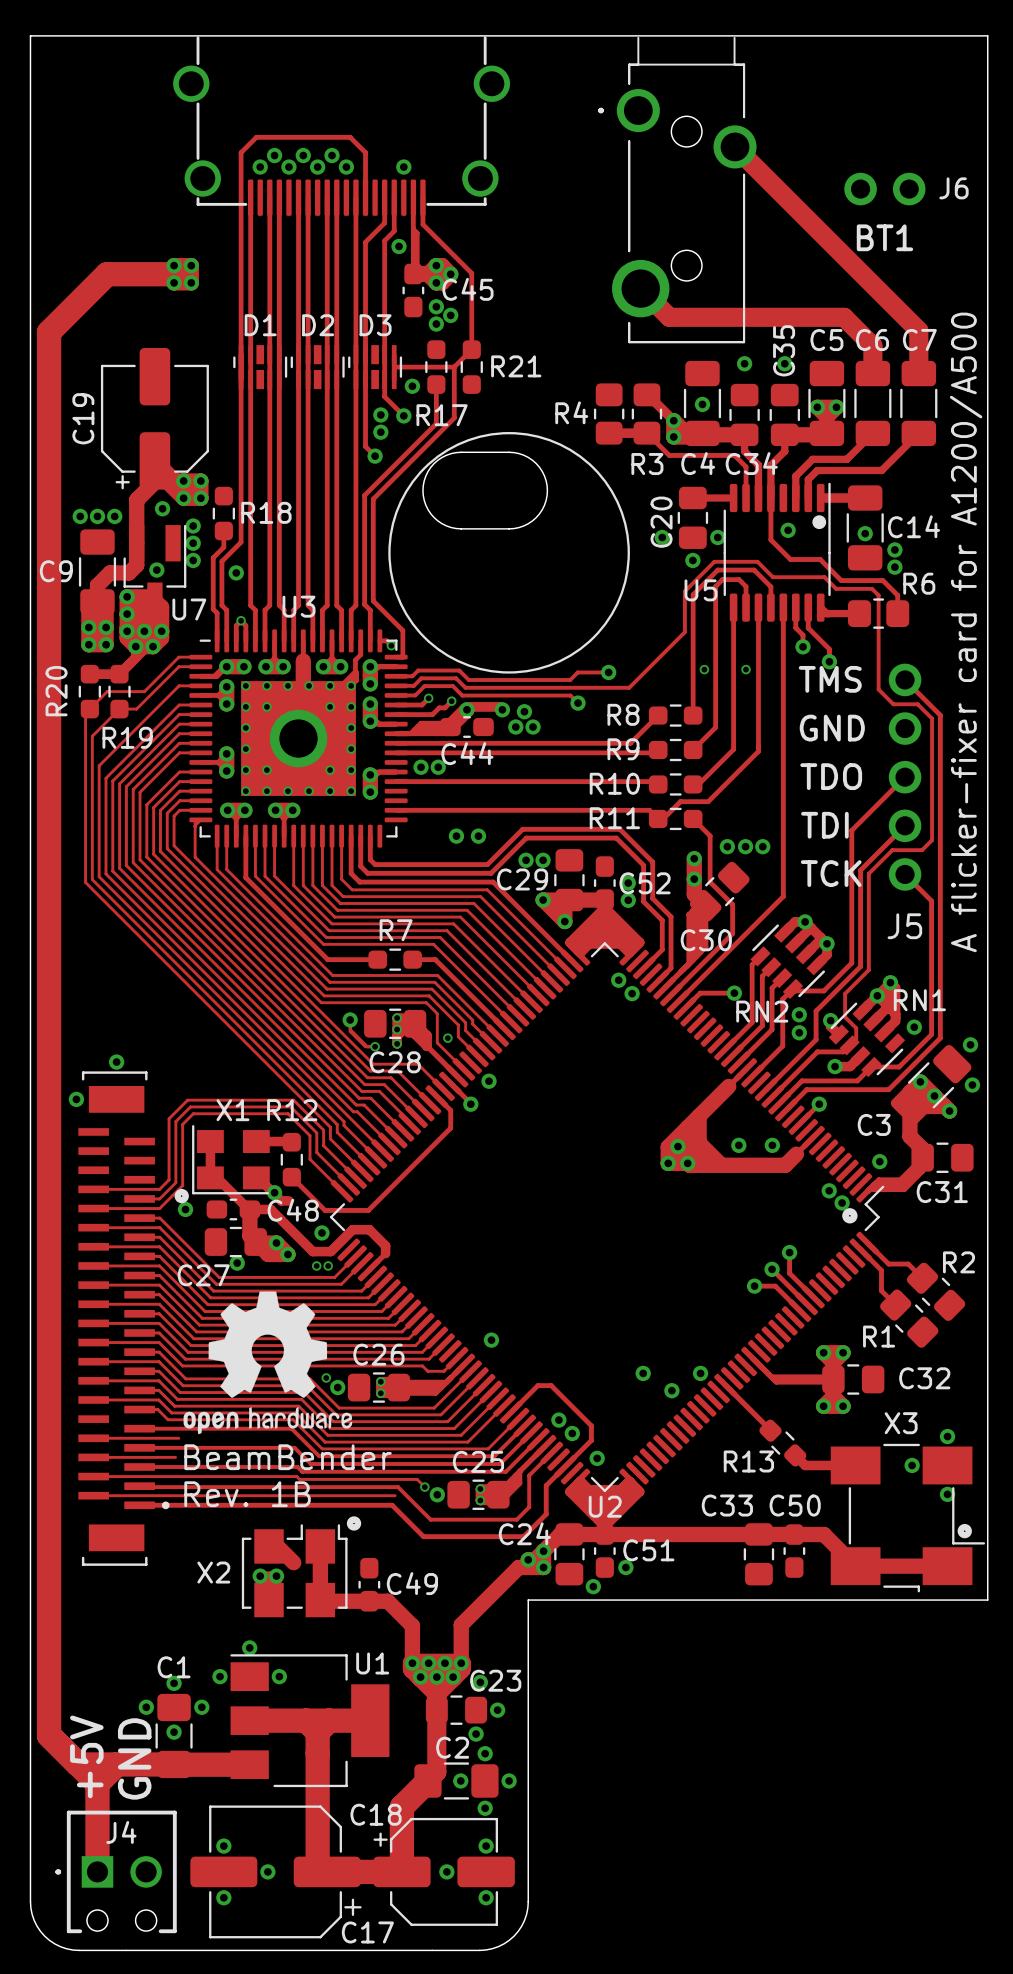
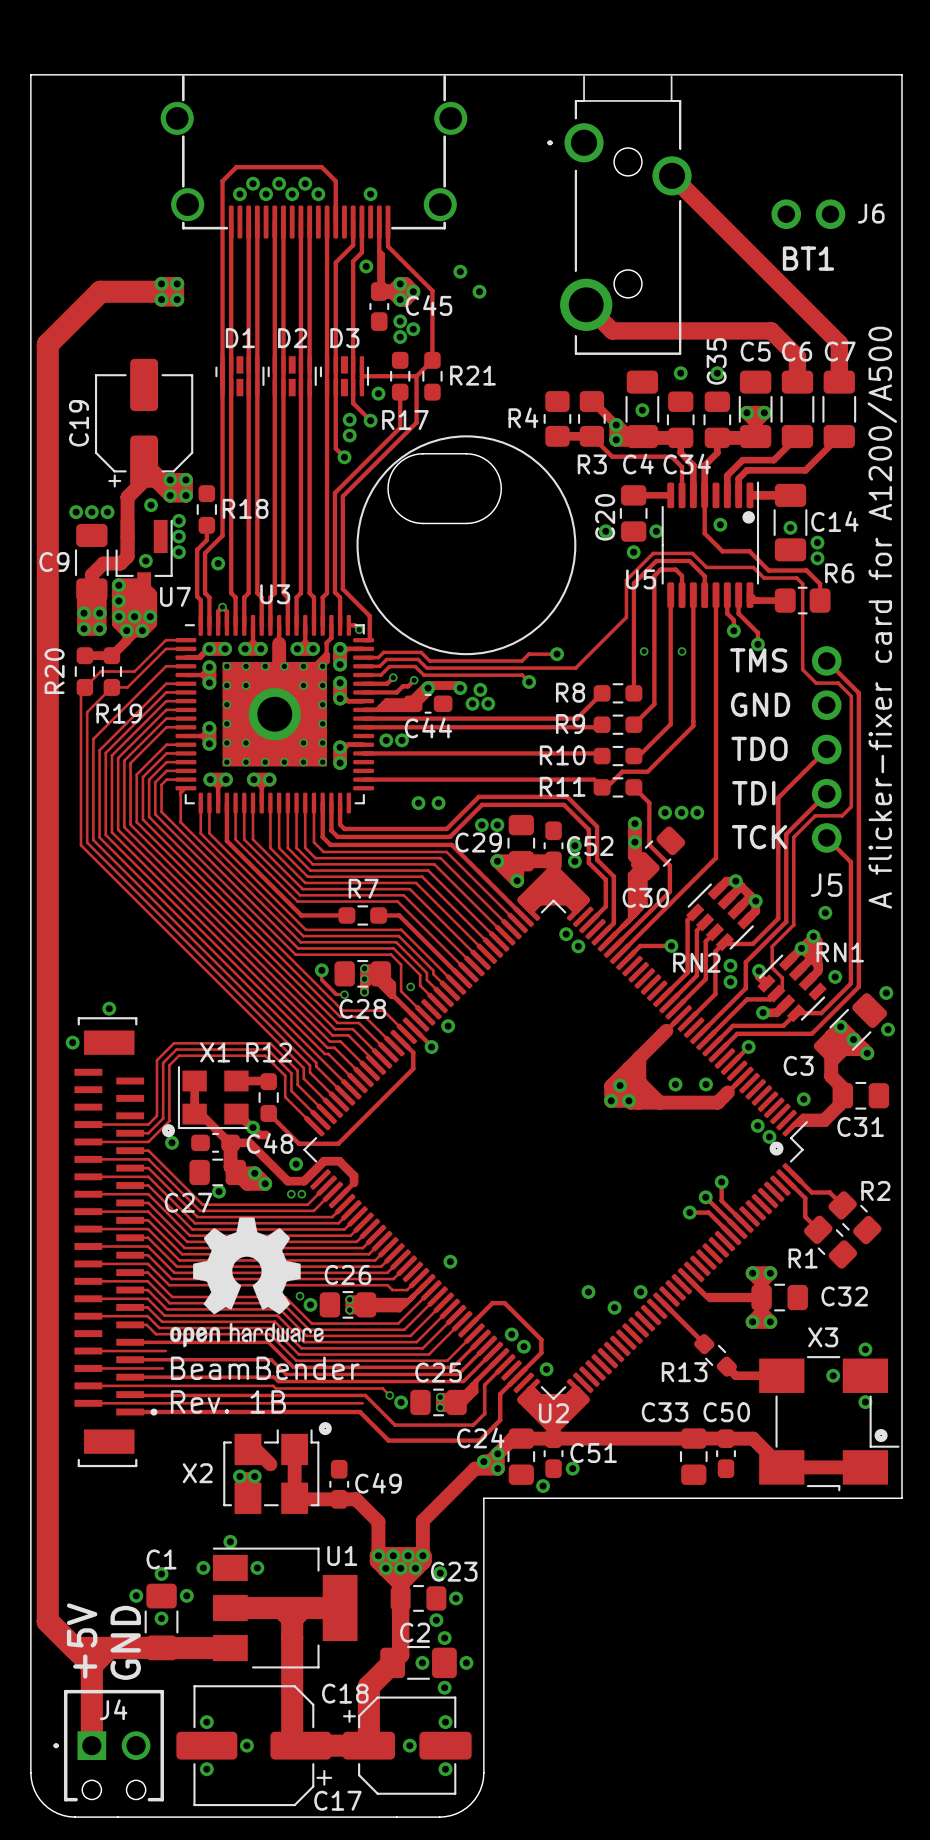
via: none -> (460, 271)
via: none -> (479, 291)
via: none -> (825, 912)

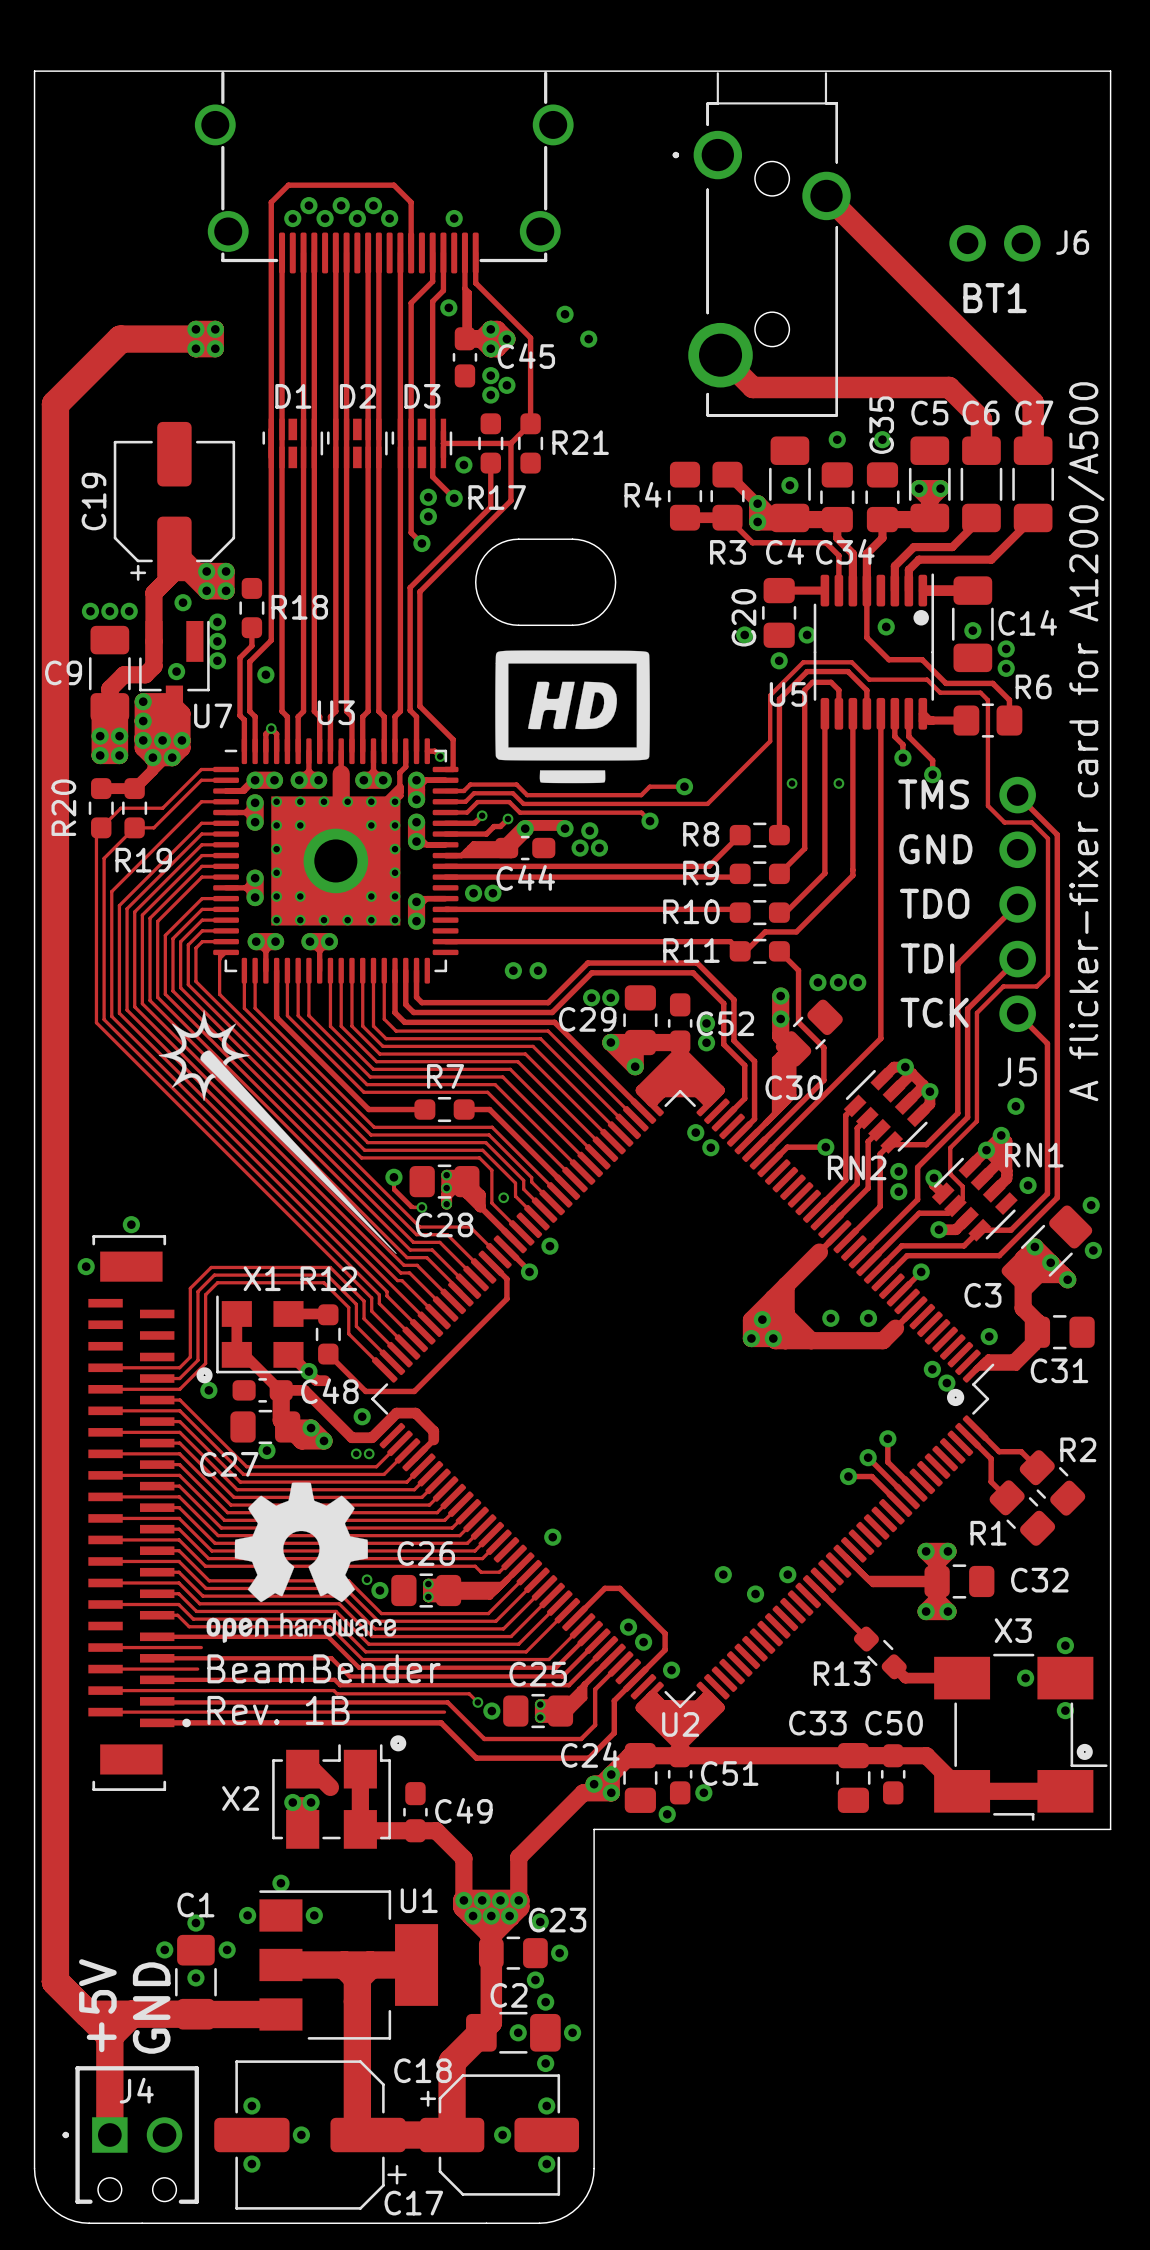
drawing: [356, 435, 577, 656] -> none
drawing: none -> [495, 650, 650, 784]
drawing: none -> [158, 1010, 397, 1254]

